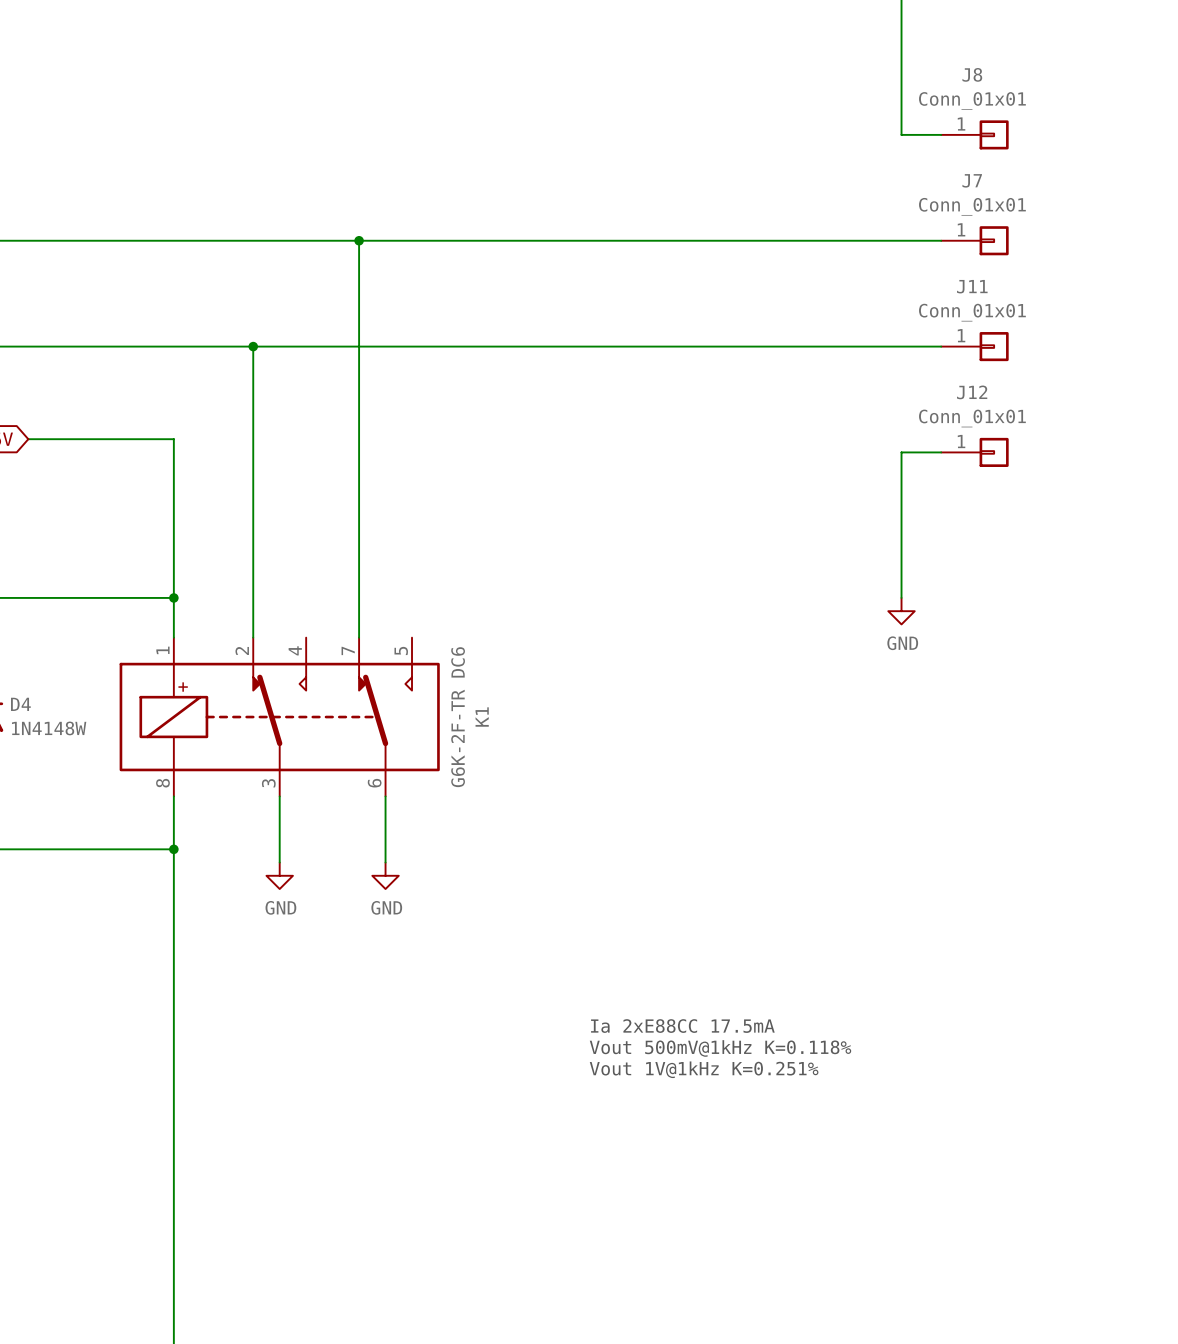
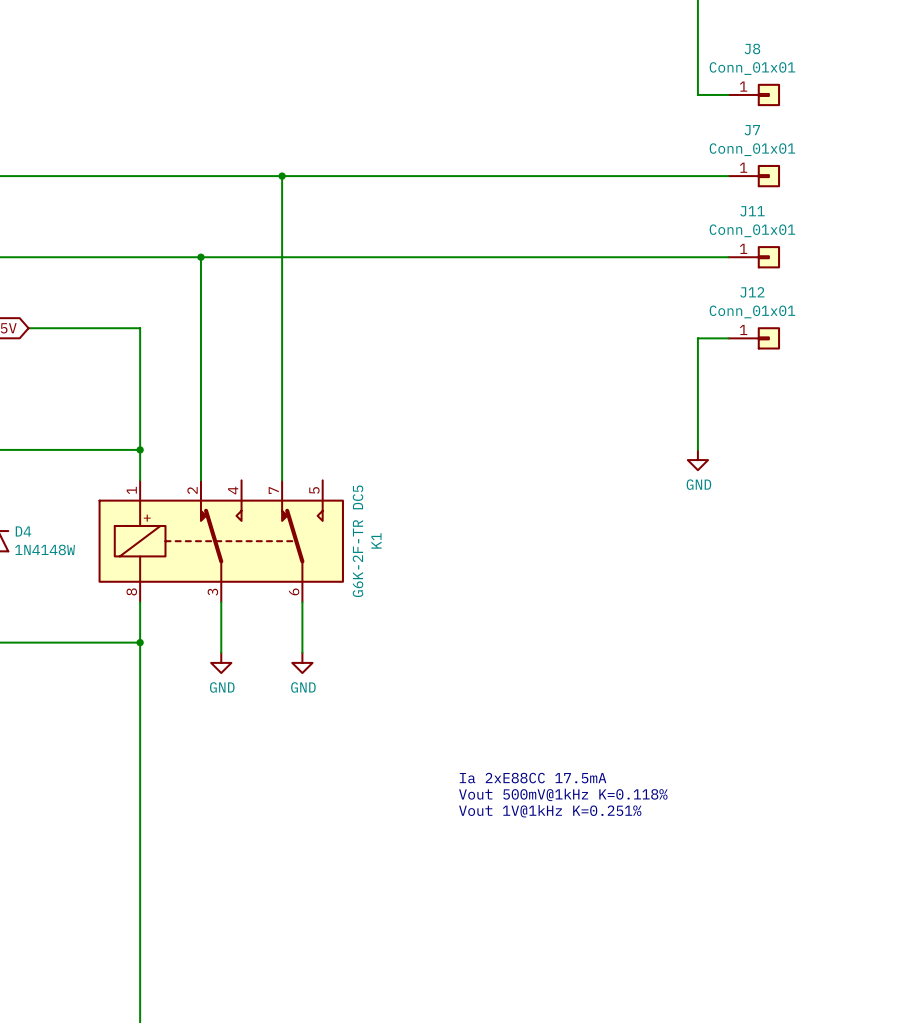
K1 value: G6K-2F-TR DC6 (458, 717) -> G6K-2F-TR DC5 (358, 541)

